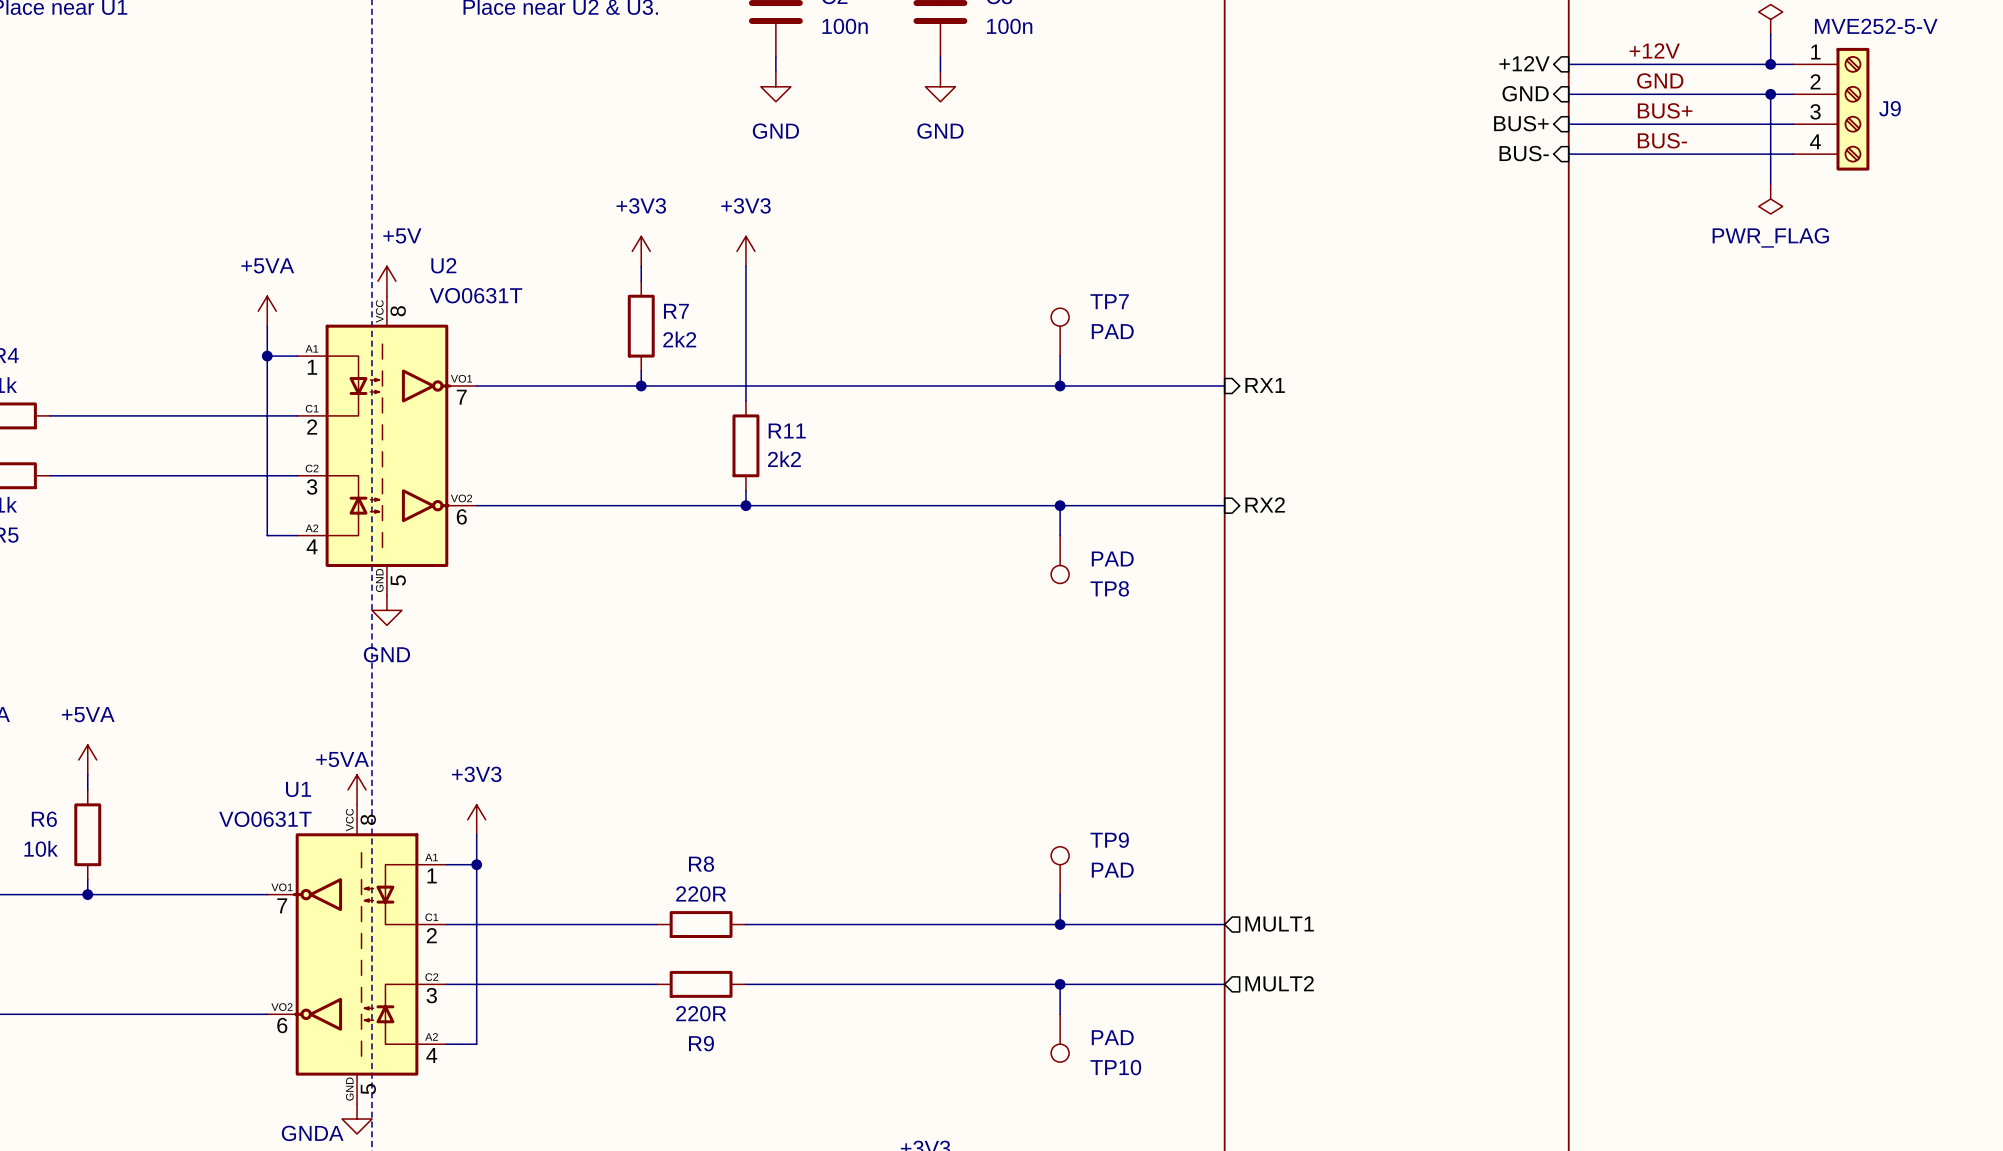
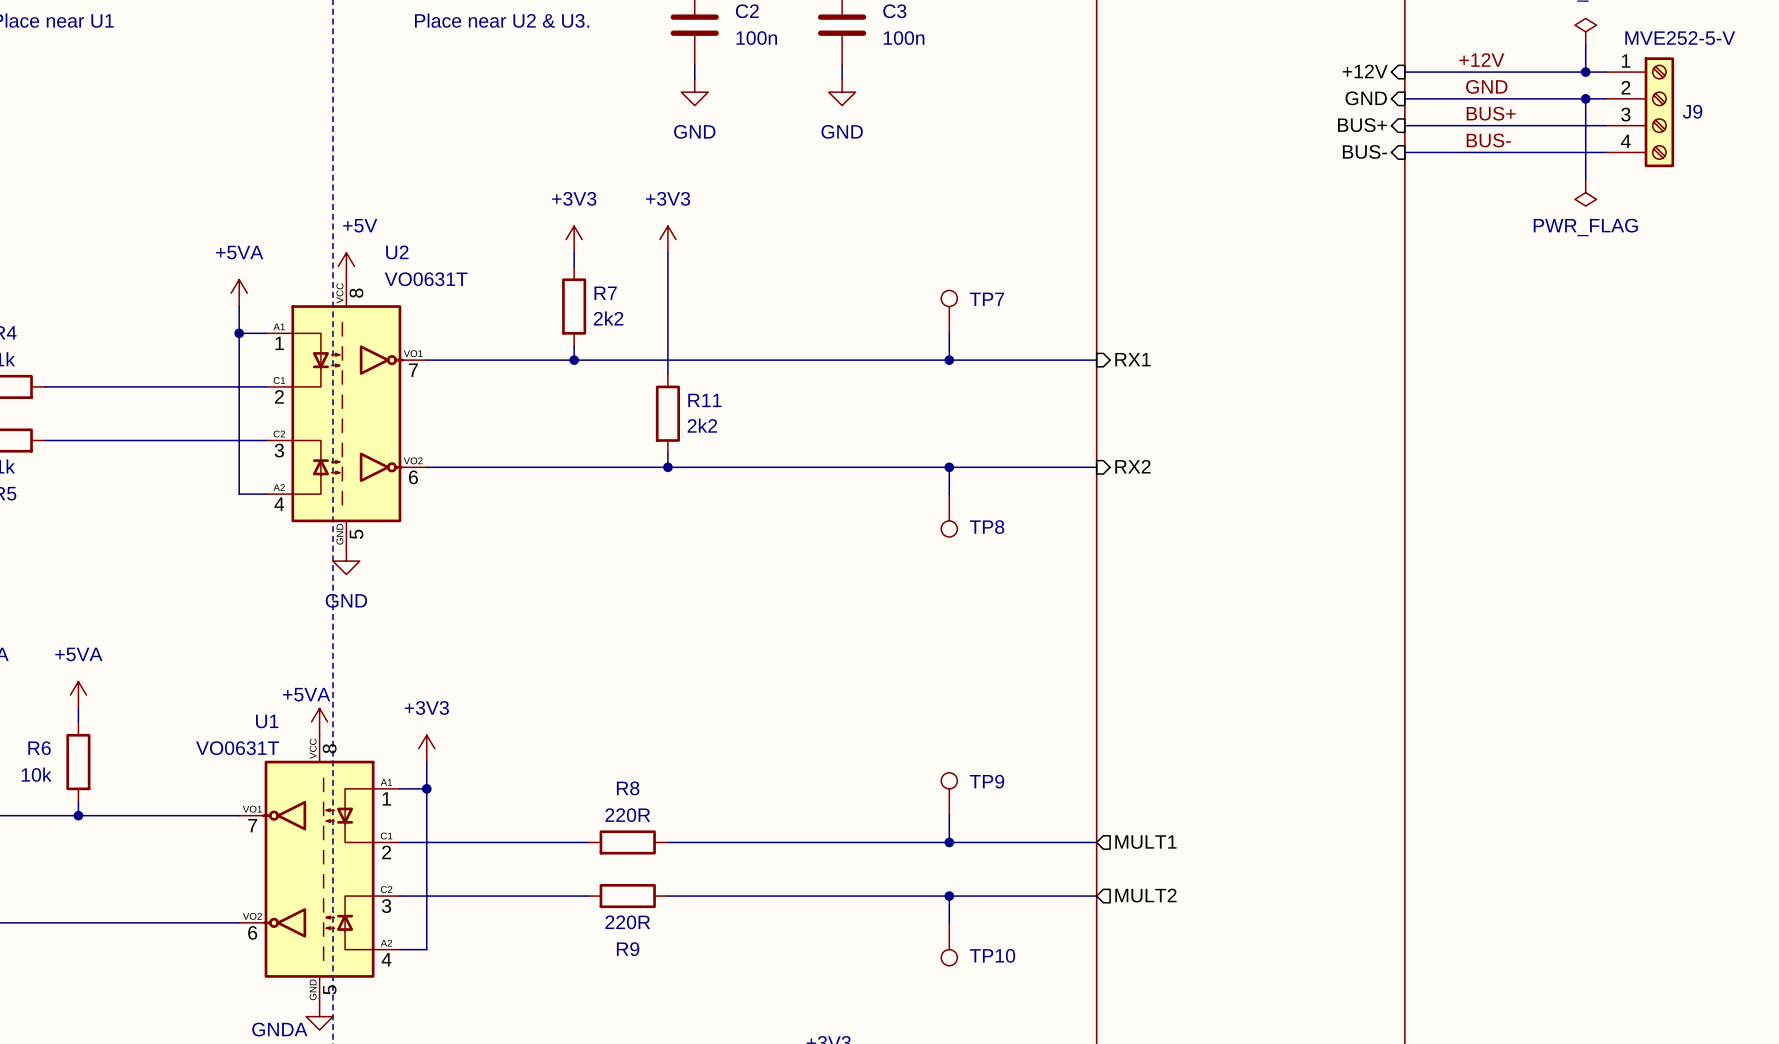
TP7 name position: TP7 (1109, 301) -> TP7 (986, 299)
TP7 value: PAD (1112, 331) -> none
TP8 value: PAD (1112, 558) -> none
TP8 name position: TP8 (1109, 588) -> TP8 (987, 527)
TP9 name position: TP9 (1109, 840) -> TP9 (987, 781)
TP9 value: PAD (1112, 870) -> none
TP10 value: PAD (1112, 1037) -> none
TP10 name position: TP10 (1115, 1067) -> TP10 (992, 955)

